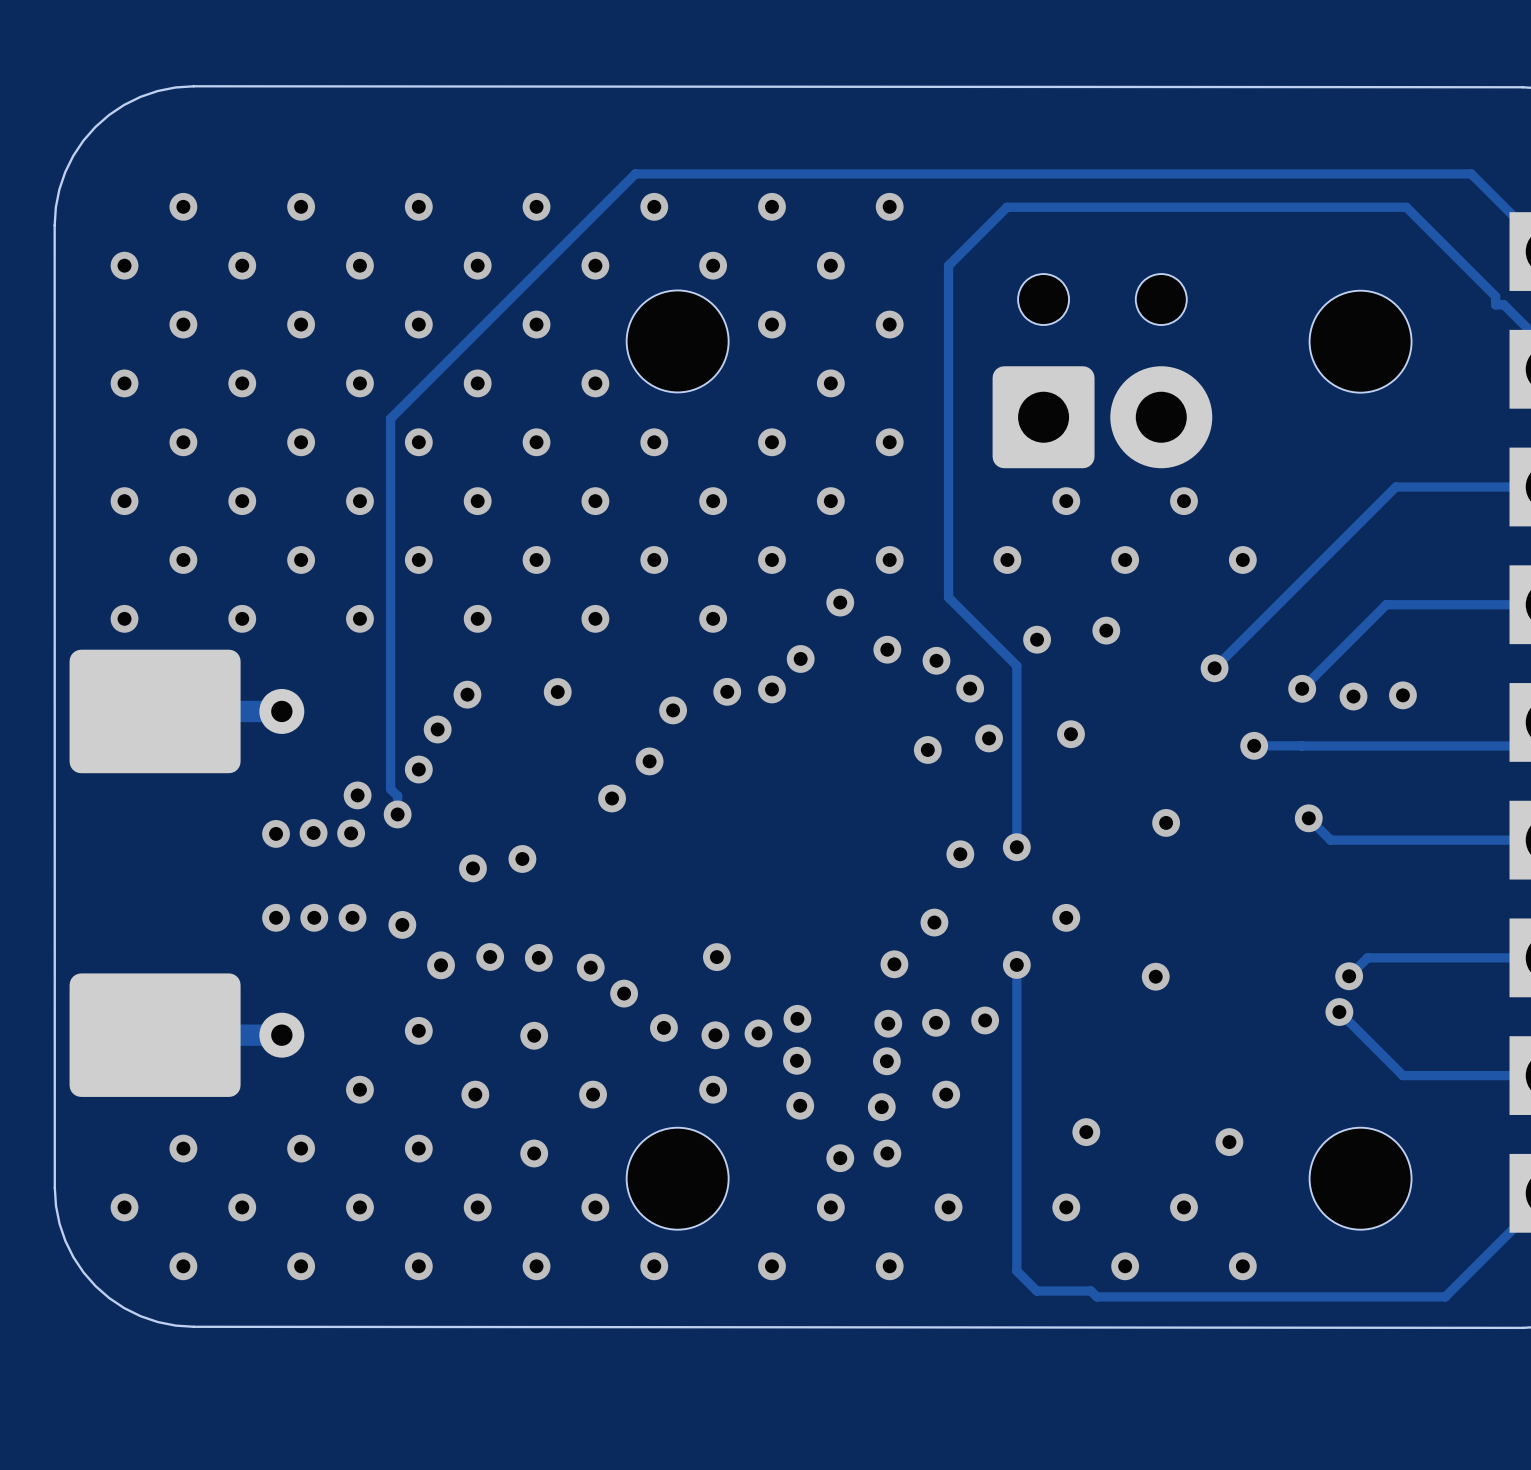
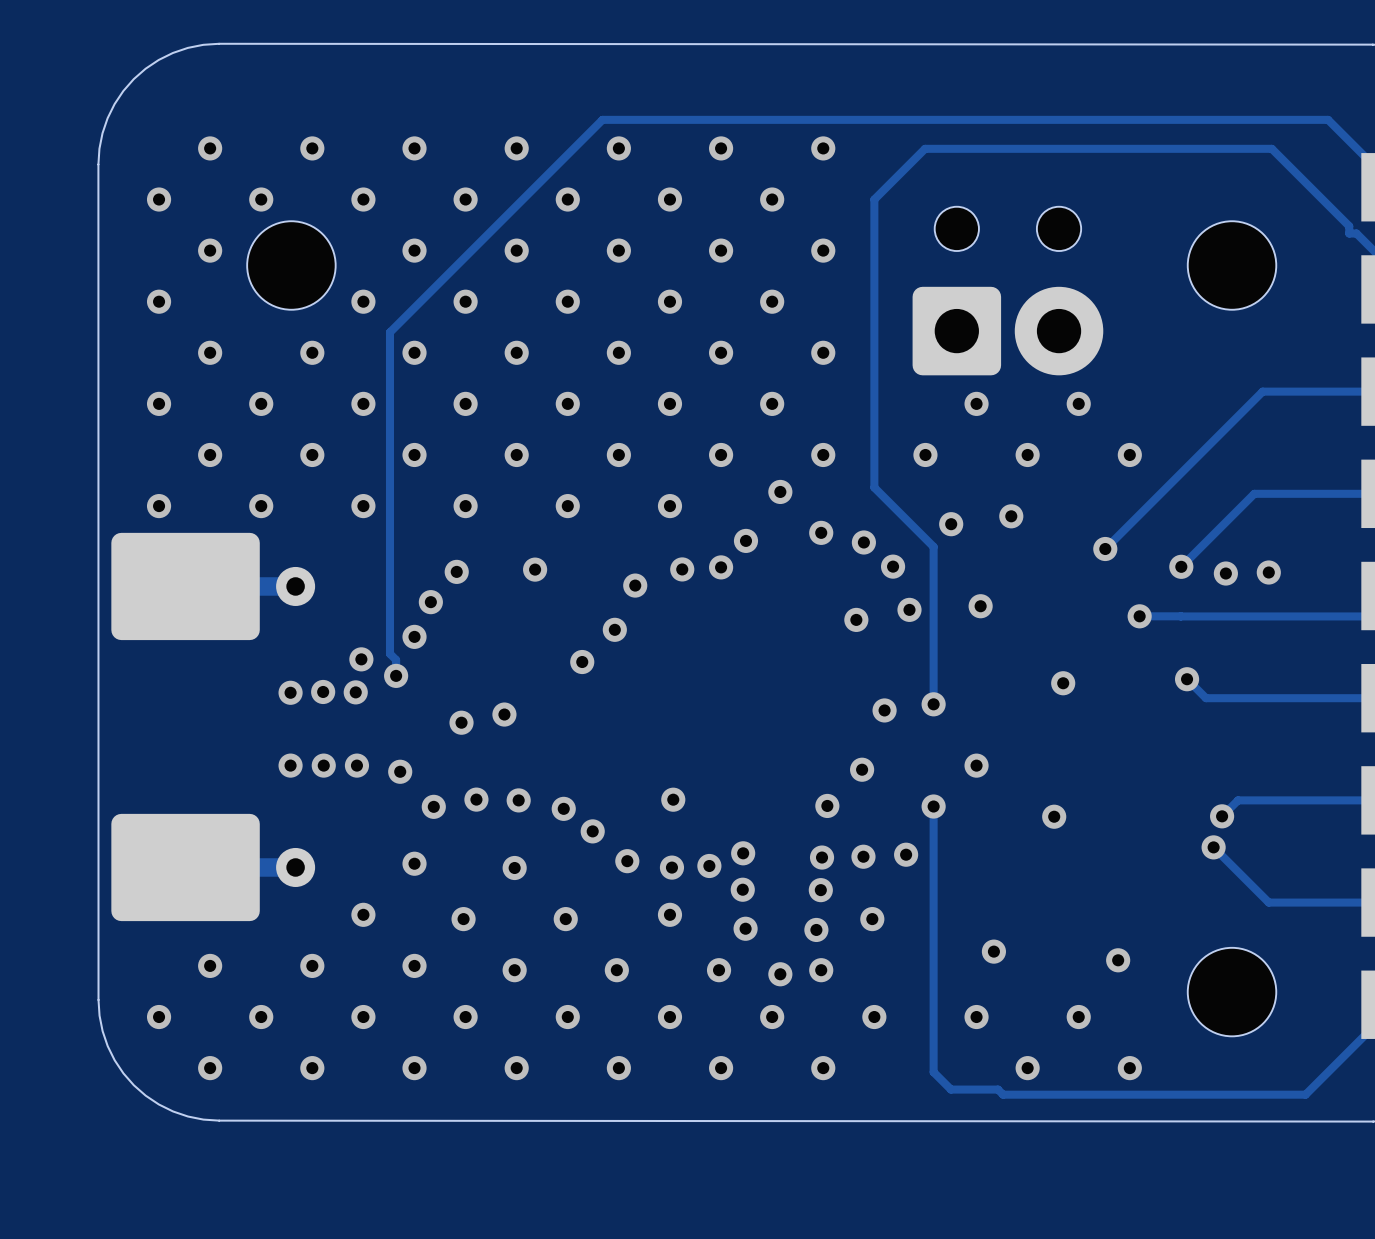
via: (301, 324) -> none
via: none -> (618, 250)
part position: (677, 341) -> (291, 265)
via: (242, 383) -> none
via: none -> (669, 301)
via: none -> (616, 970)
via: none -> (719, 970)
part: (677, 1178) -> none
via: none -> (669, 1017)

